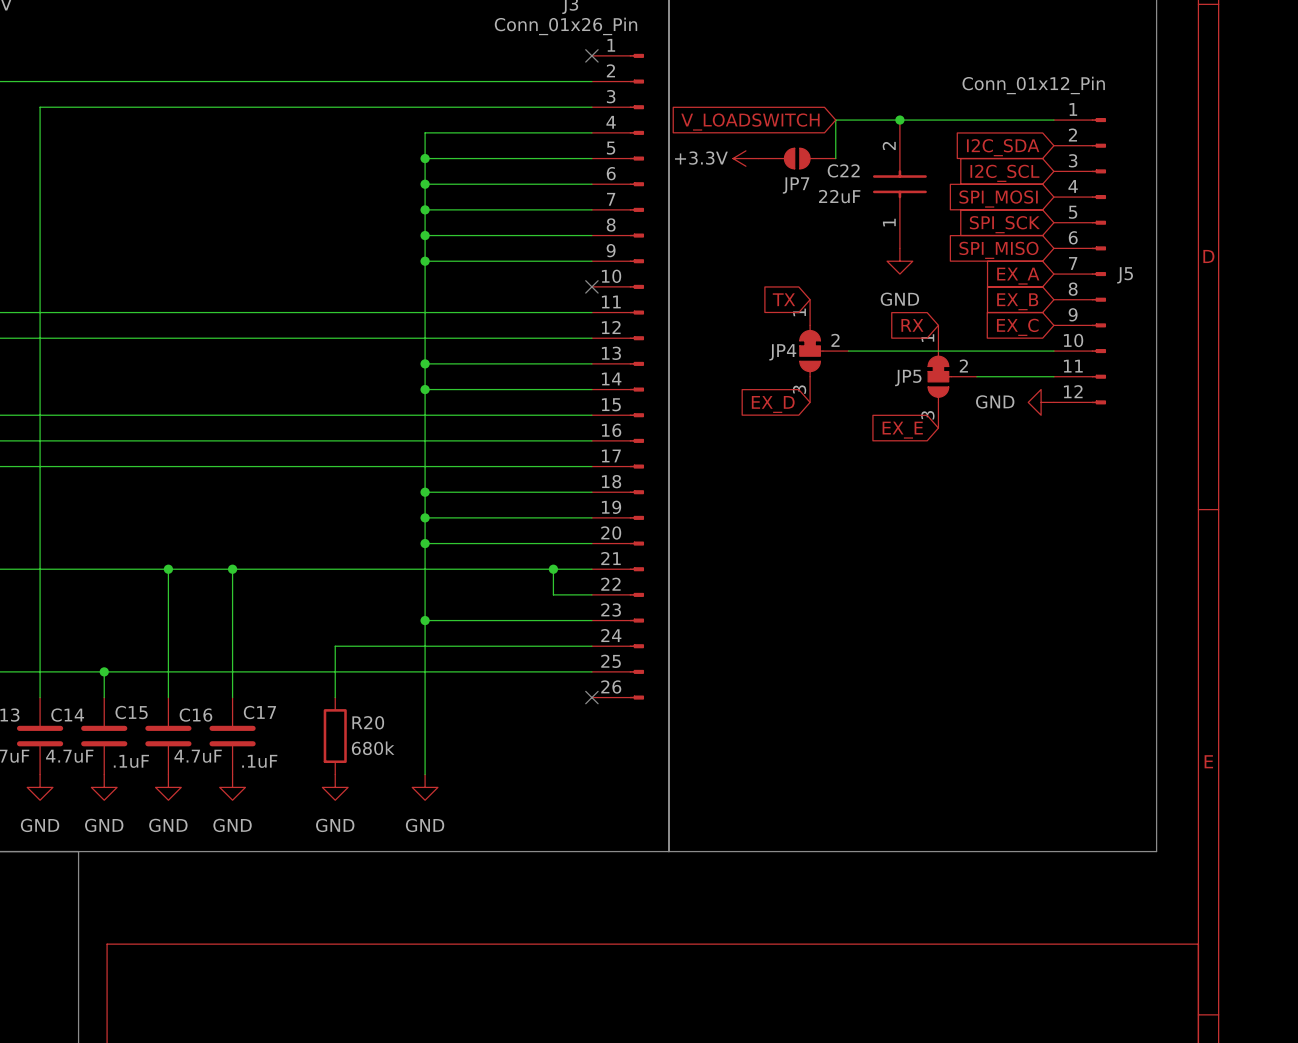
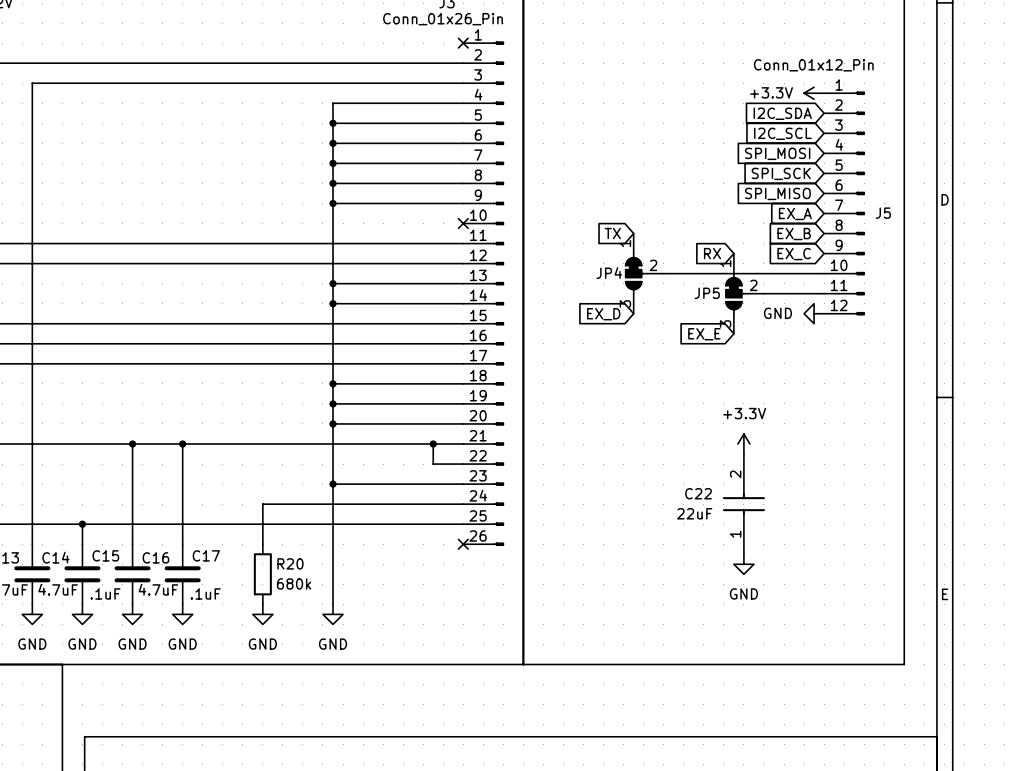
junction: (899, 120) -> none
power symbol: none -> +3.3V (814, 93)
wire: (1053, 120) (835, 120) (835, 158) -> none
global label: V_LOADSWITCH (750, 122) -> none
power symbol: +3.3V (745, 158) -> none
JP7: (797, 158) -> none
C22 position: (899, 184) -> (743, 504)
power symbol: GND (899, 261) -> none
power symbol: none -> +3.3V (743, 444)
power symbol: none -> GND (743, 564)

